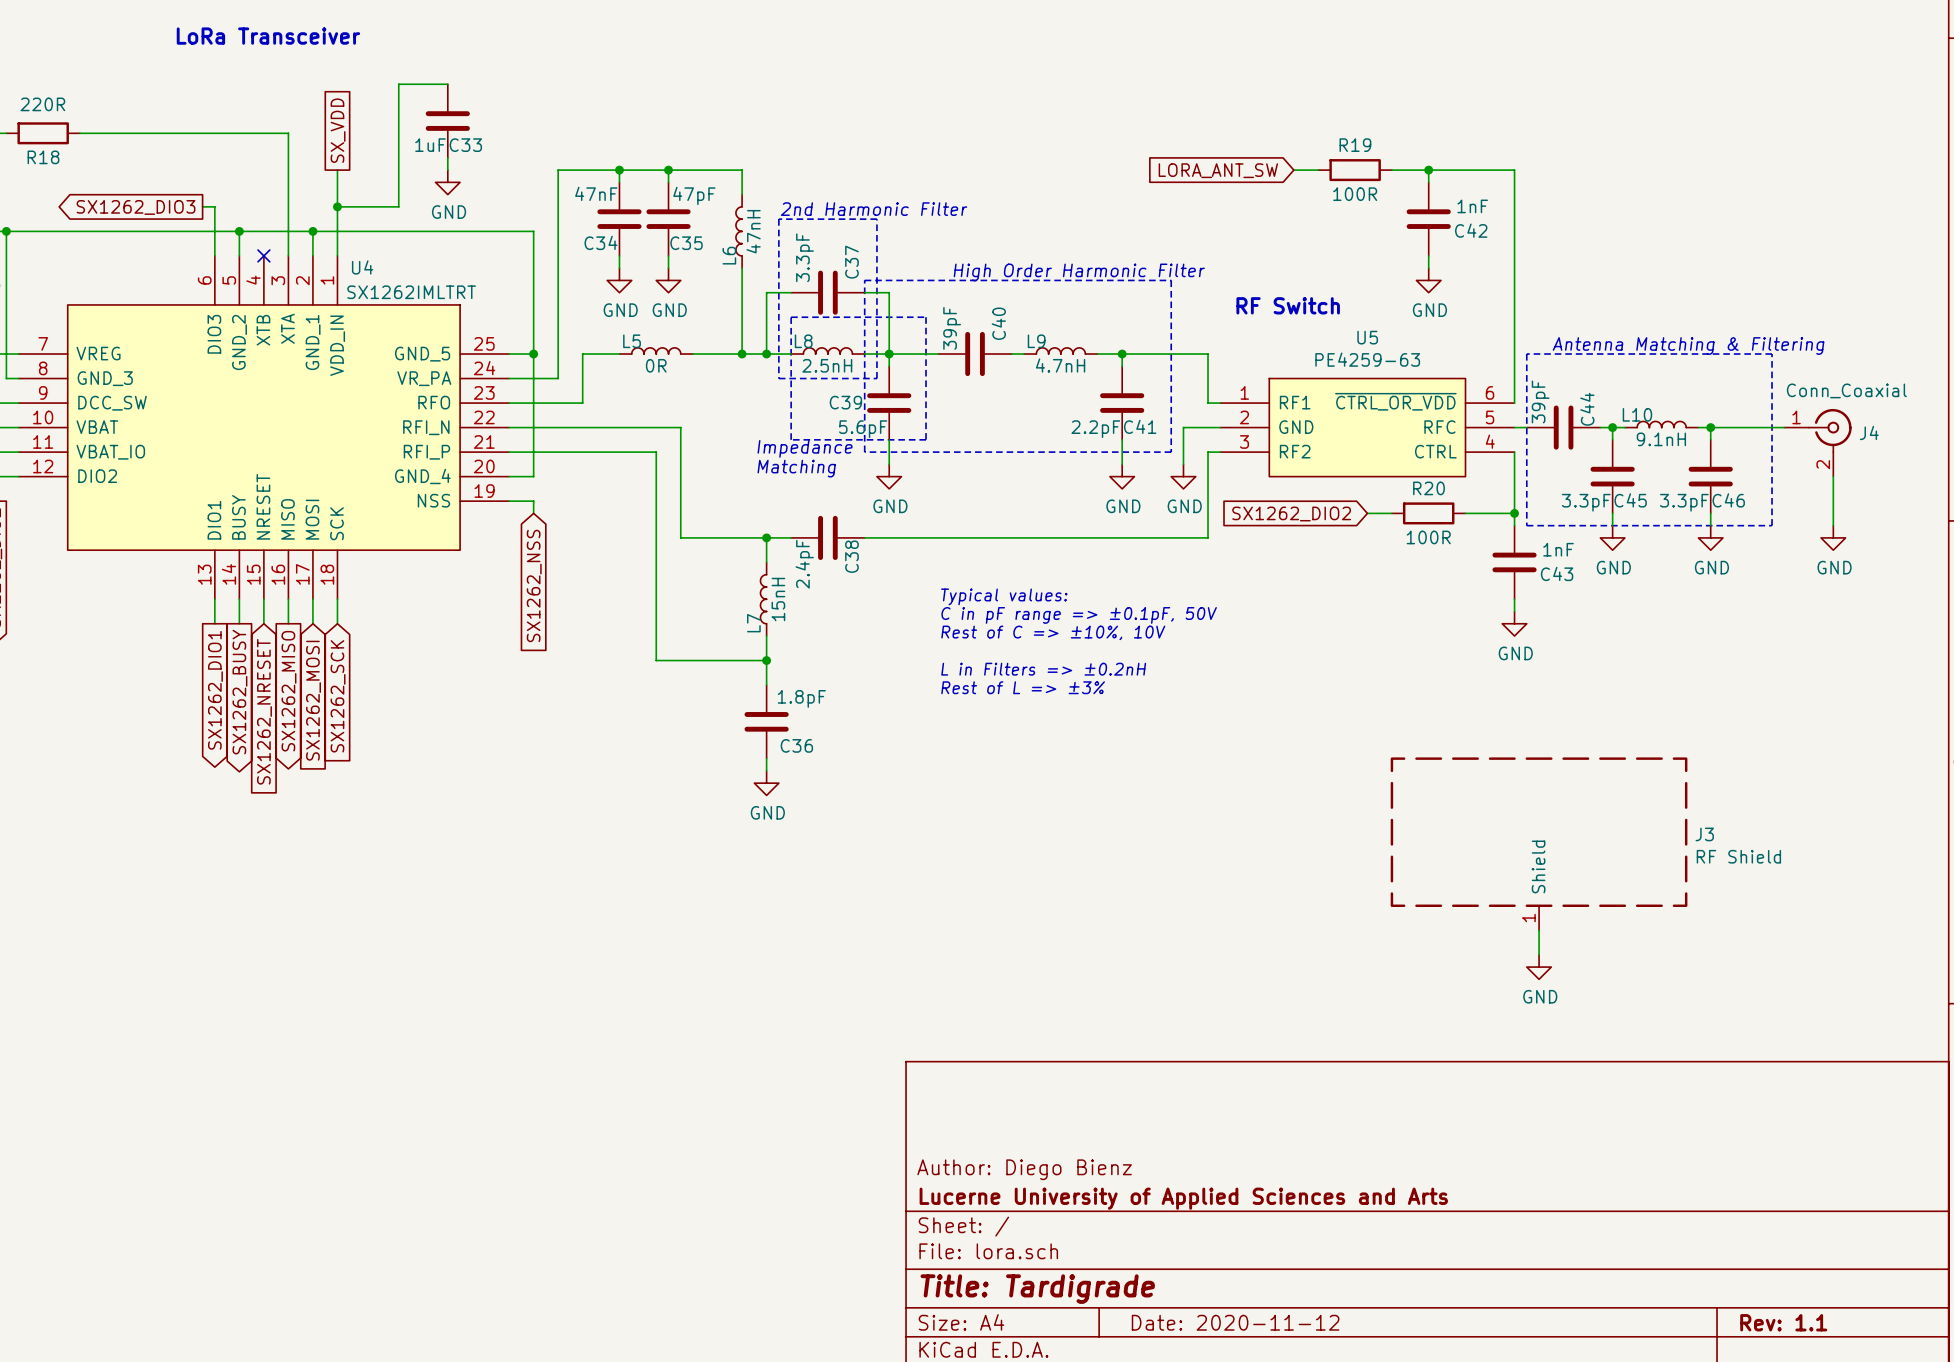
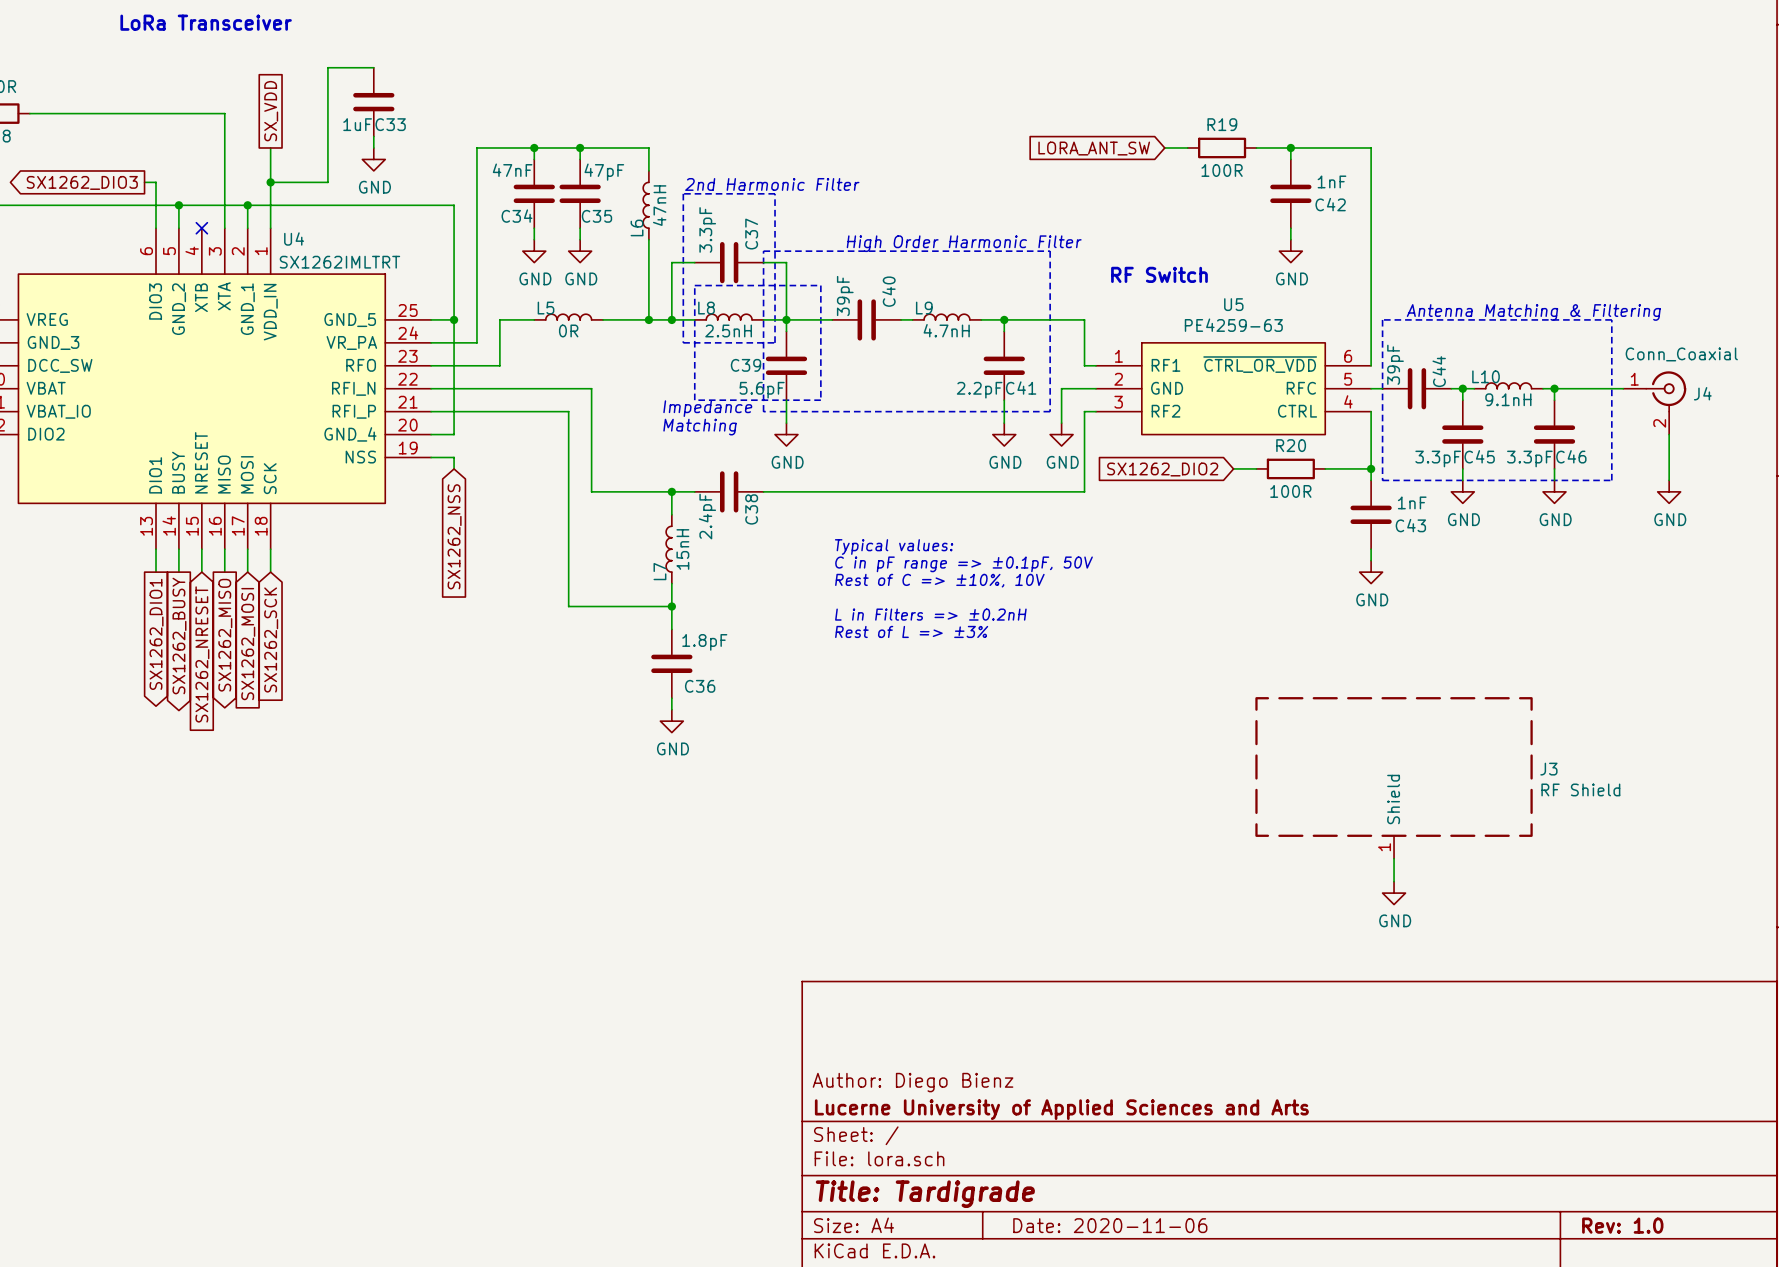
title block: Date: 2020-11-12 (1235, 1322) -> Date: 2020-11-06 (1110, 1225)
title block: Rev: 1.1 (1783, 1322) -> Rev: 1.0 (1622, 1225)

